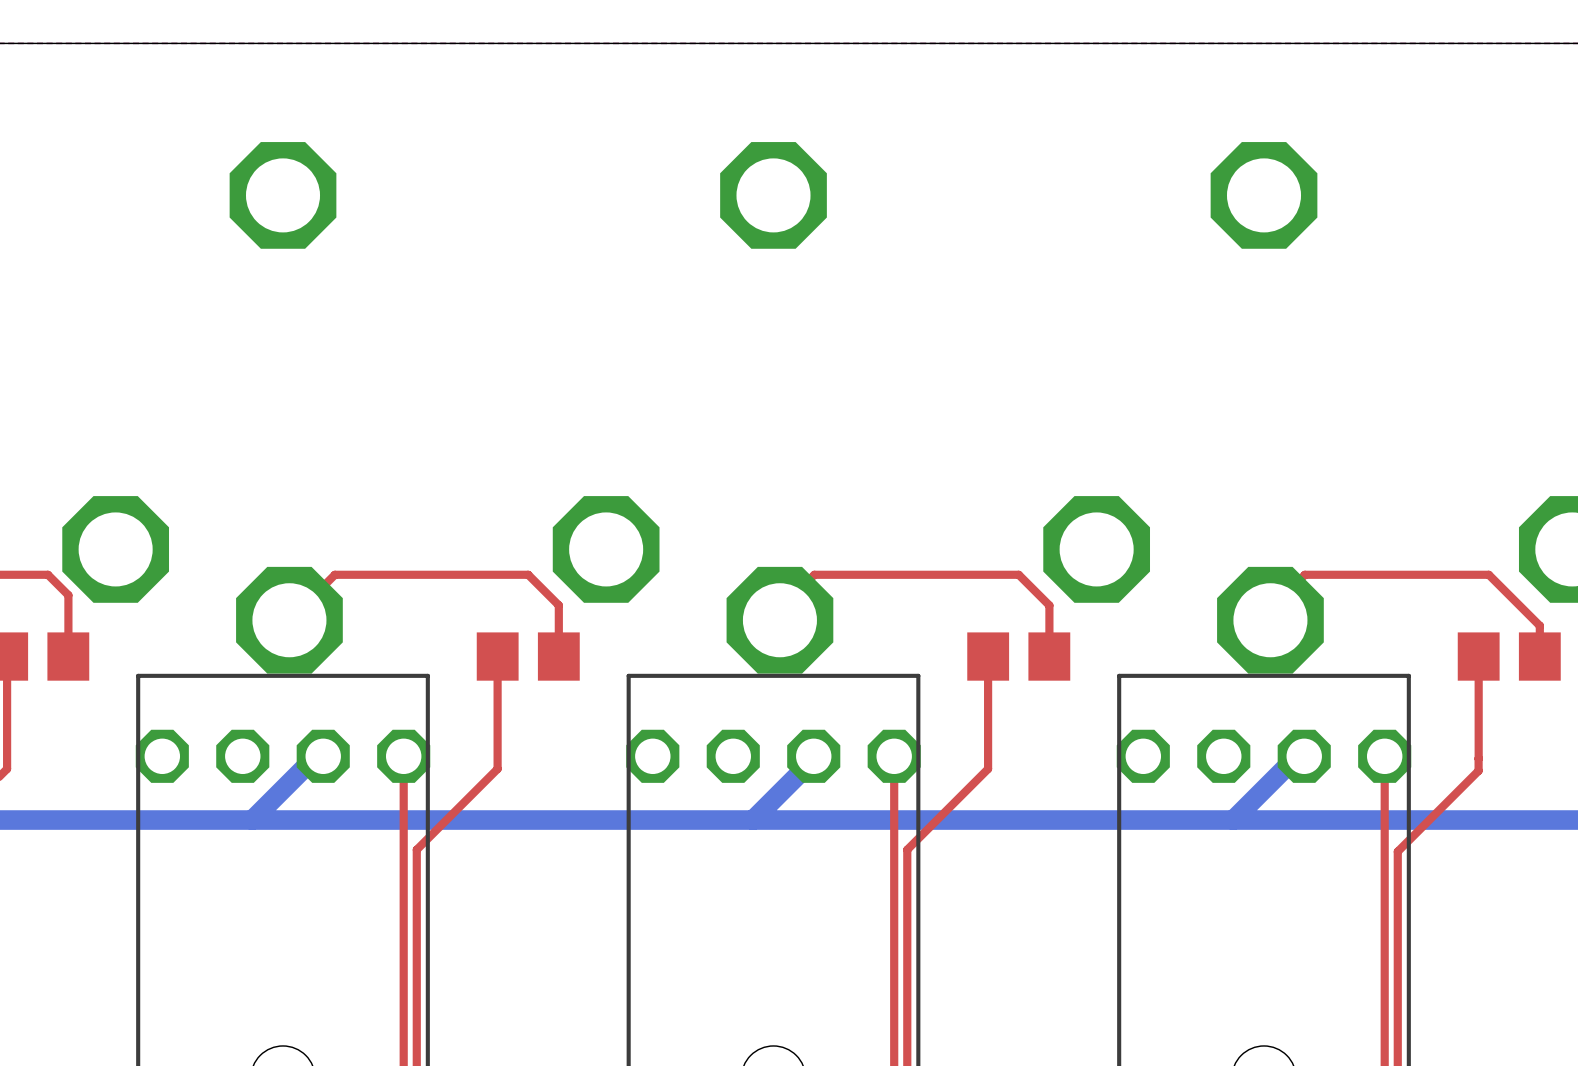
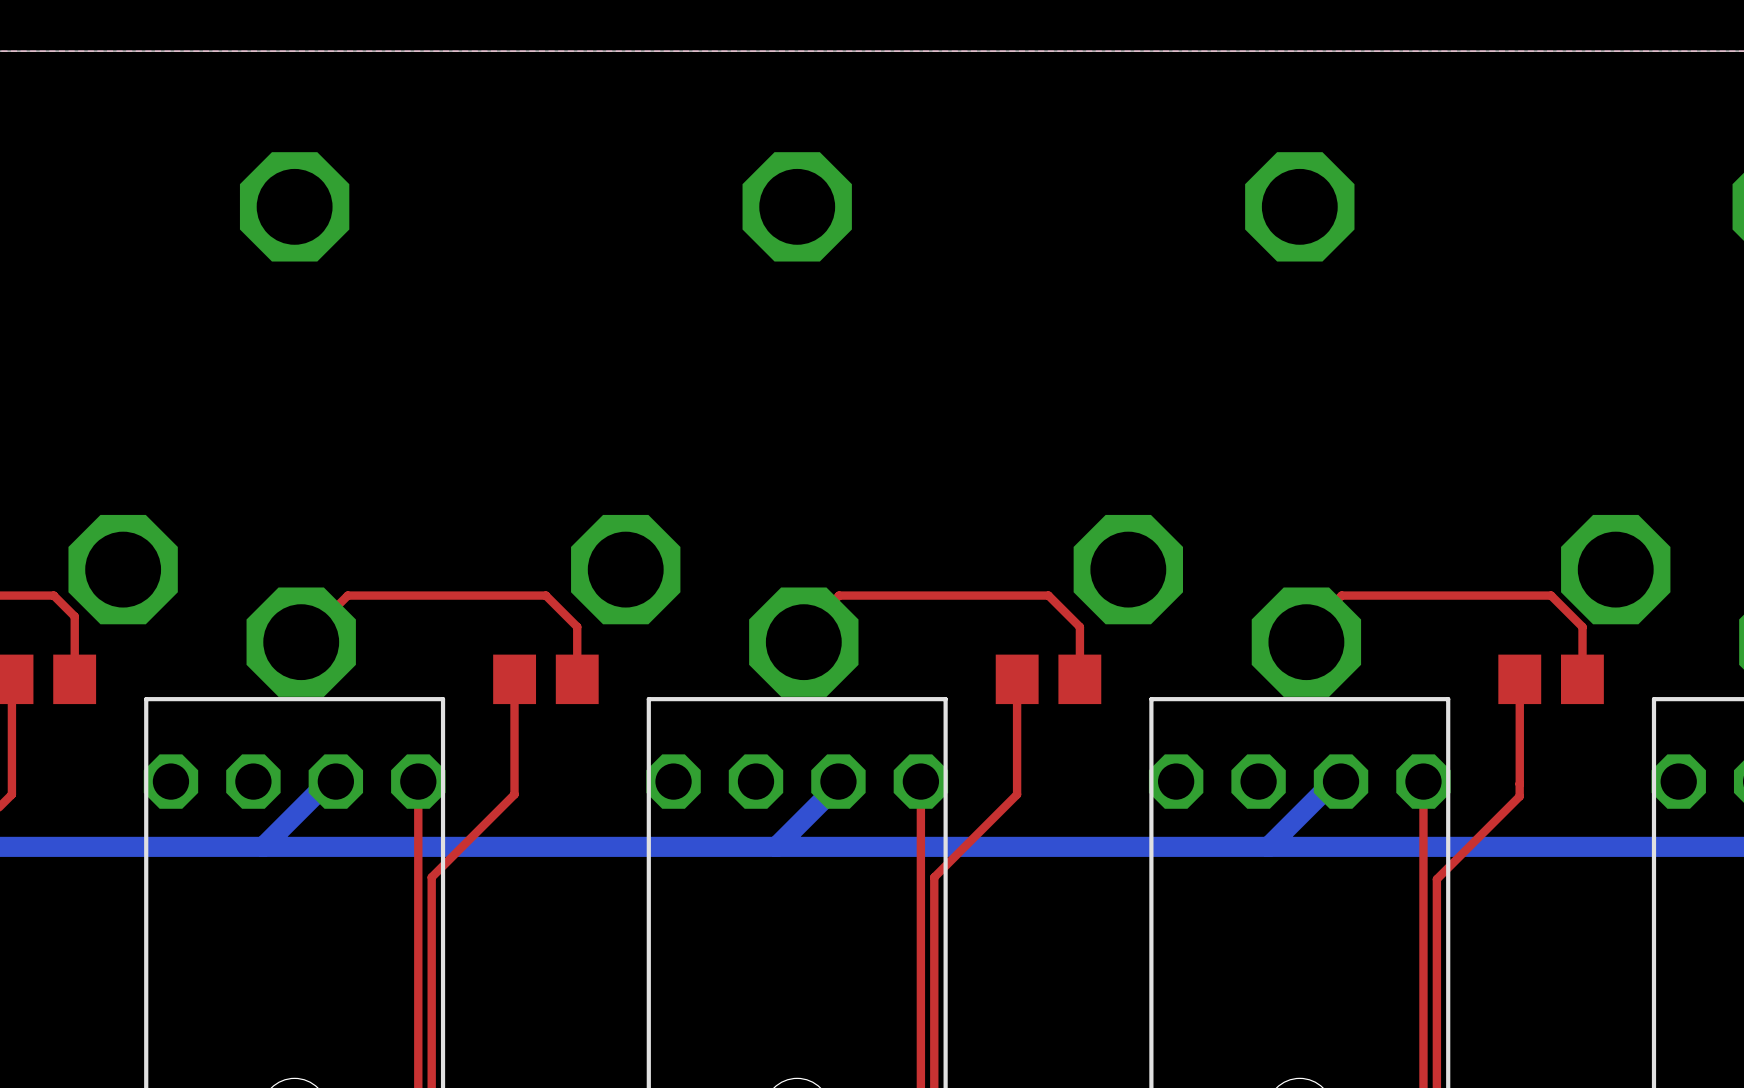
top track: (1488, 574) (1539, 625) -> (1530, 595) (1551, 595) (1582, 626) (1582, 648)

